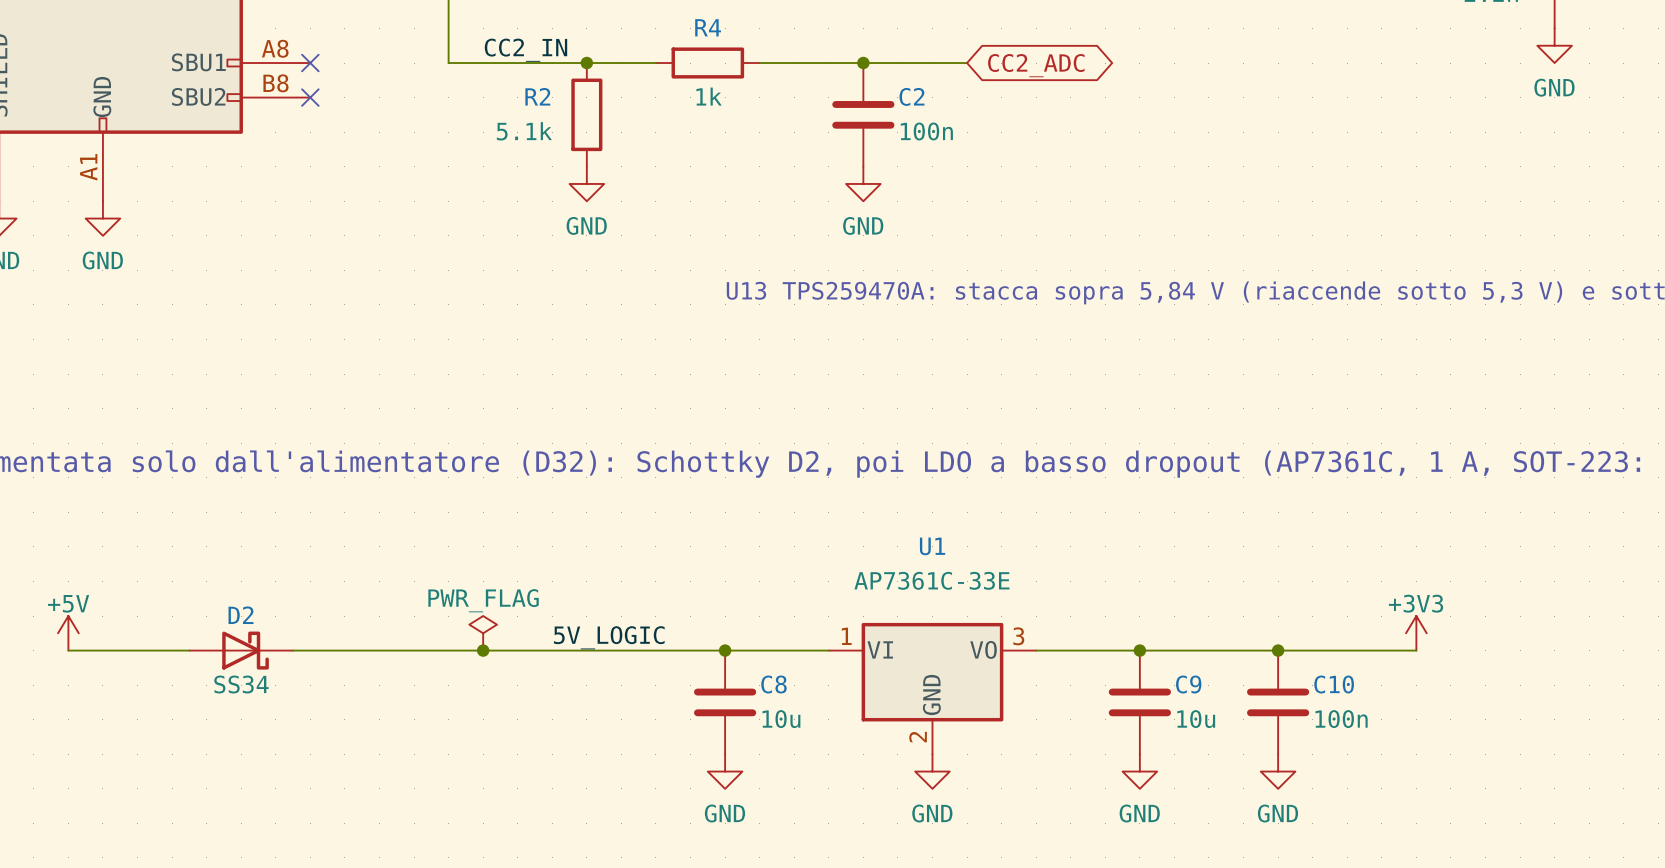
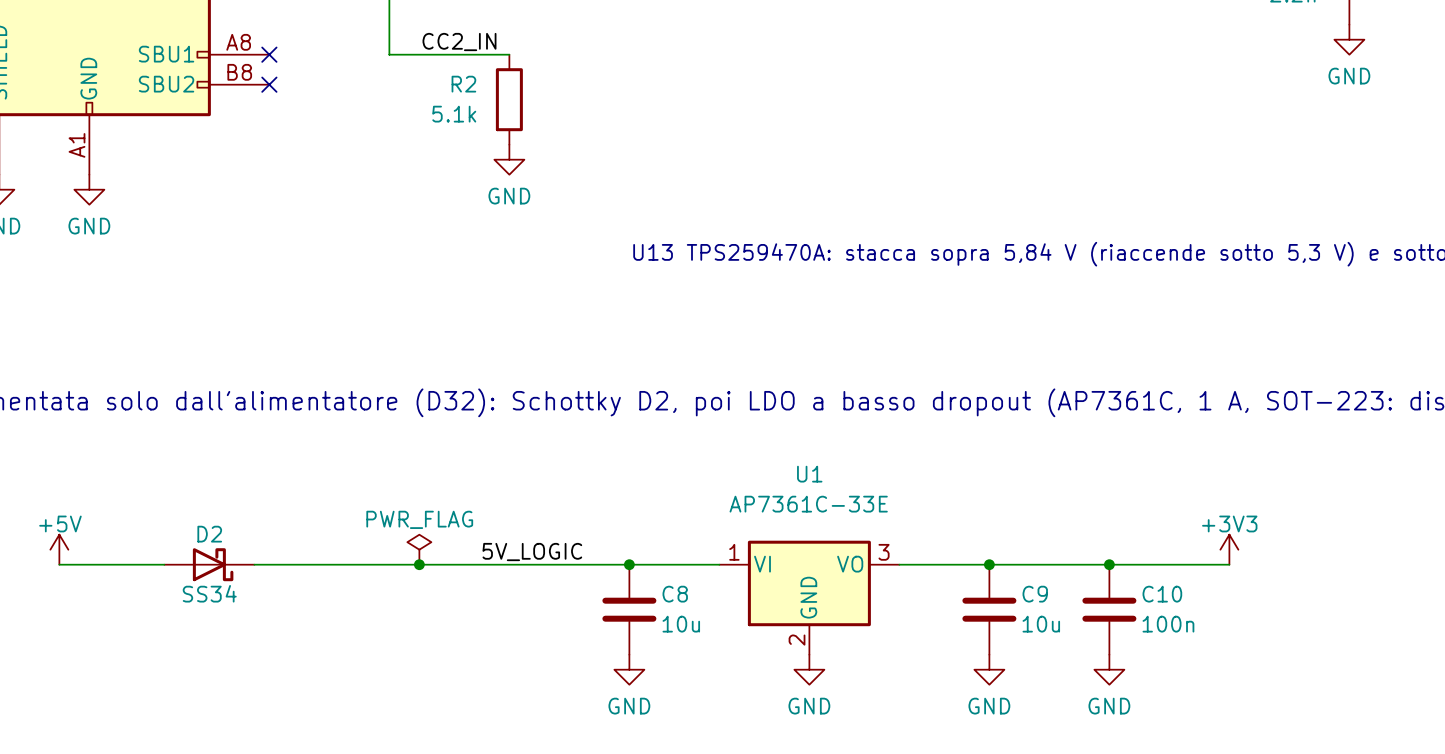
wire: (586, 63) (655, 63) -> none
junction: (586, 63) -> none
R4: 1k (707, 63) -> none
wire: (759, 63) (967, 63) -> none
junction: (863, 63) -> none
global label: CC2_ADC (1036, 65) -> none
C2: 100n (863, 114) -> none
power symbol: GND (863, 183) -> none

